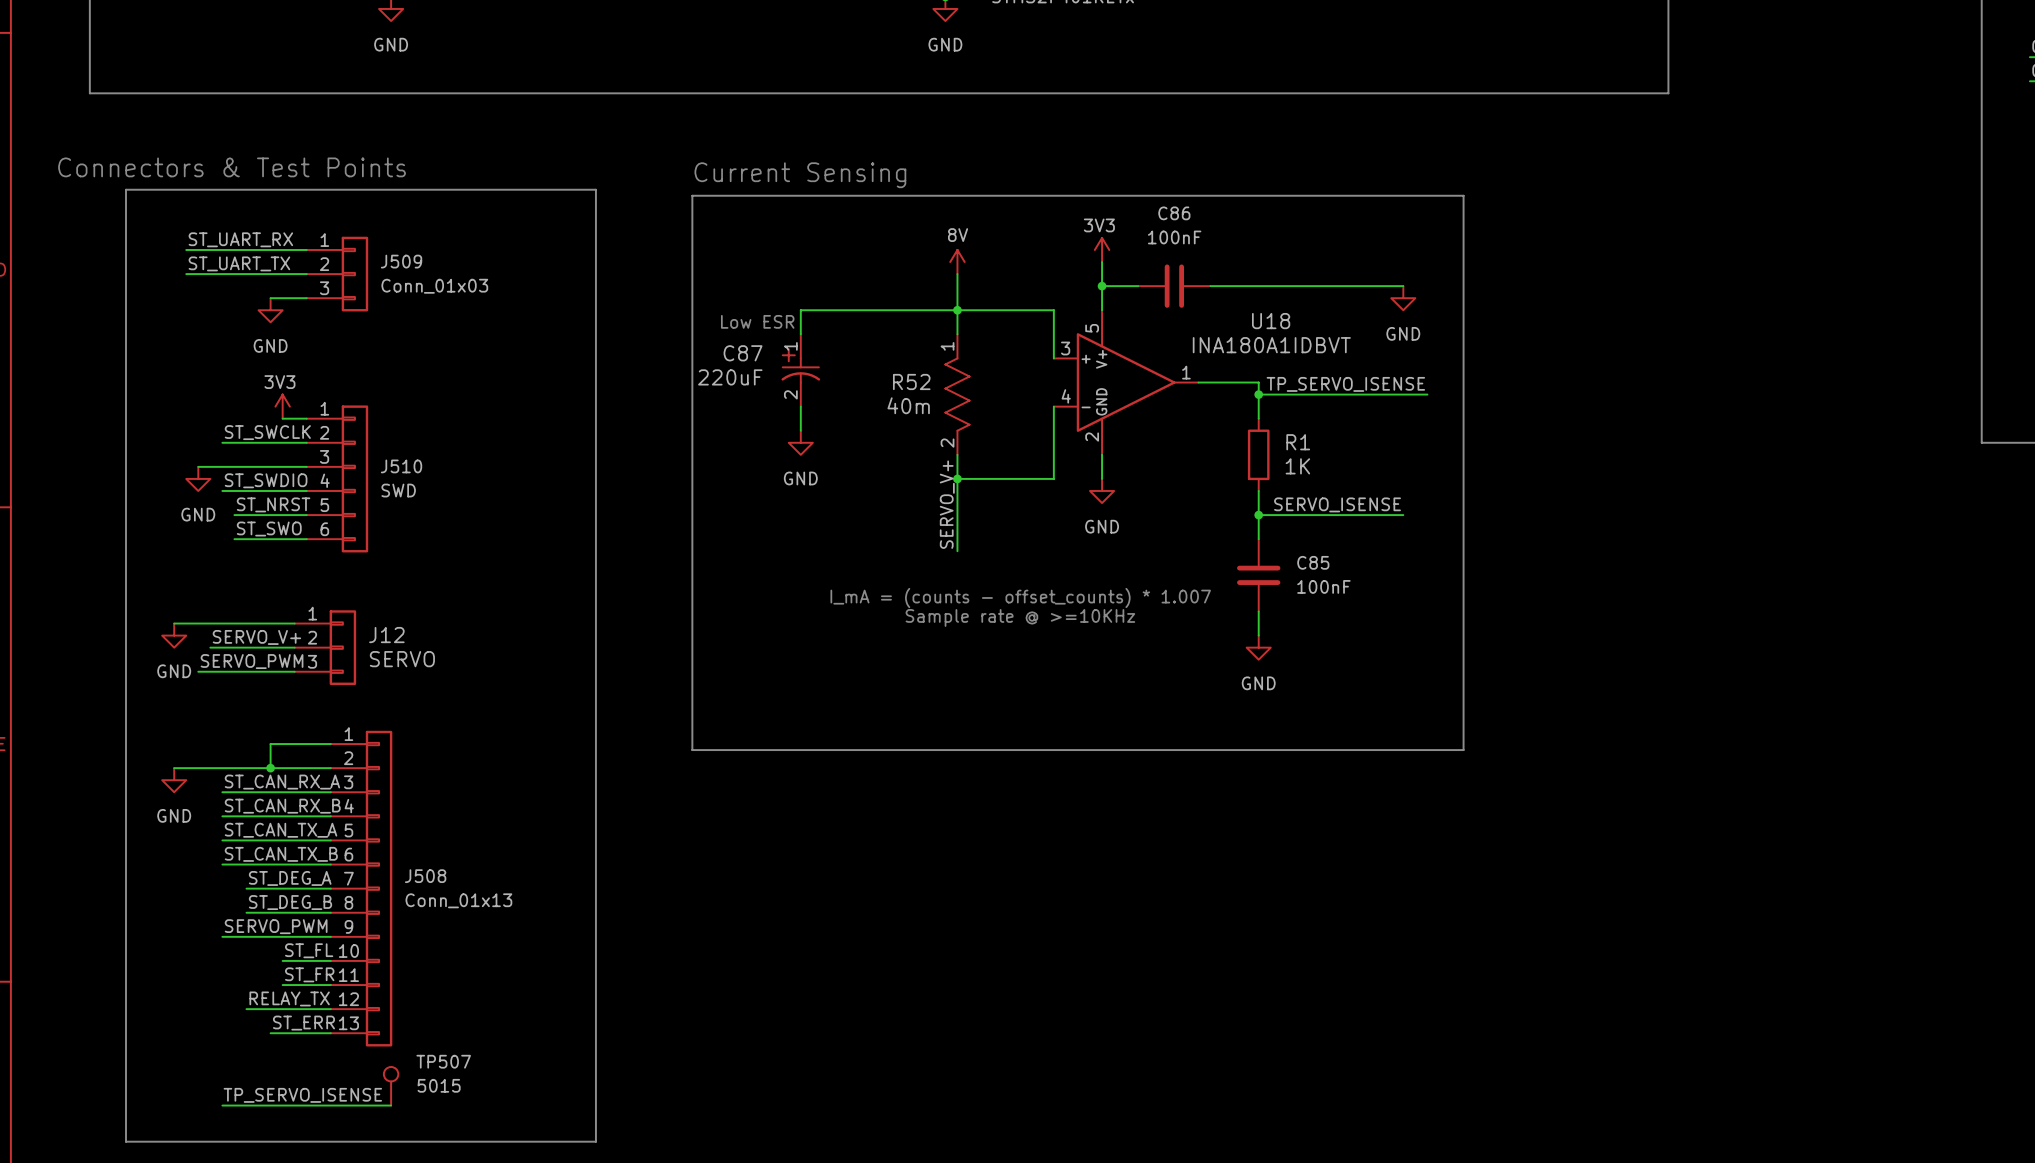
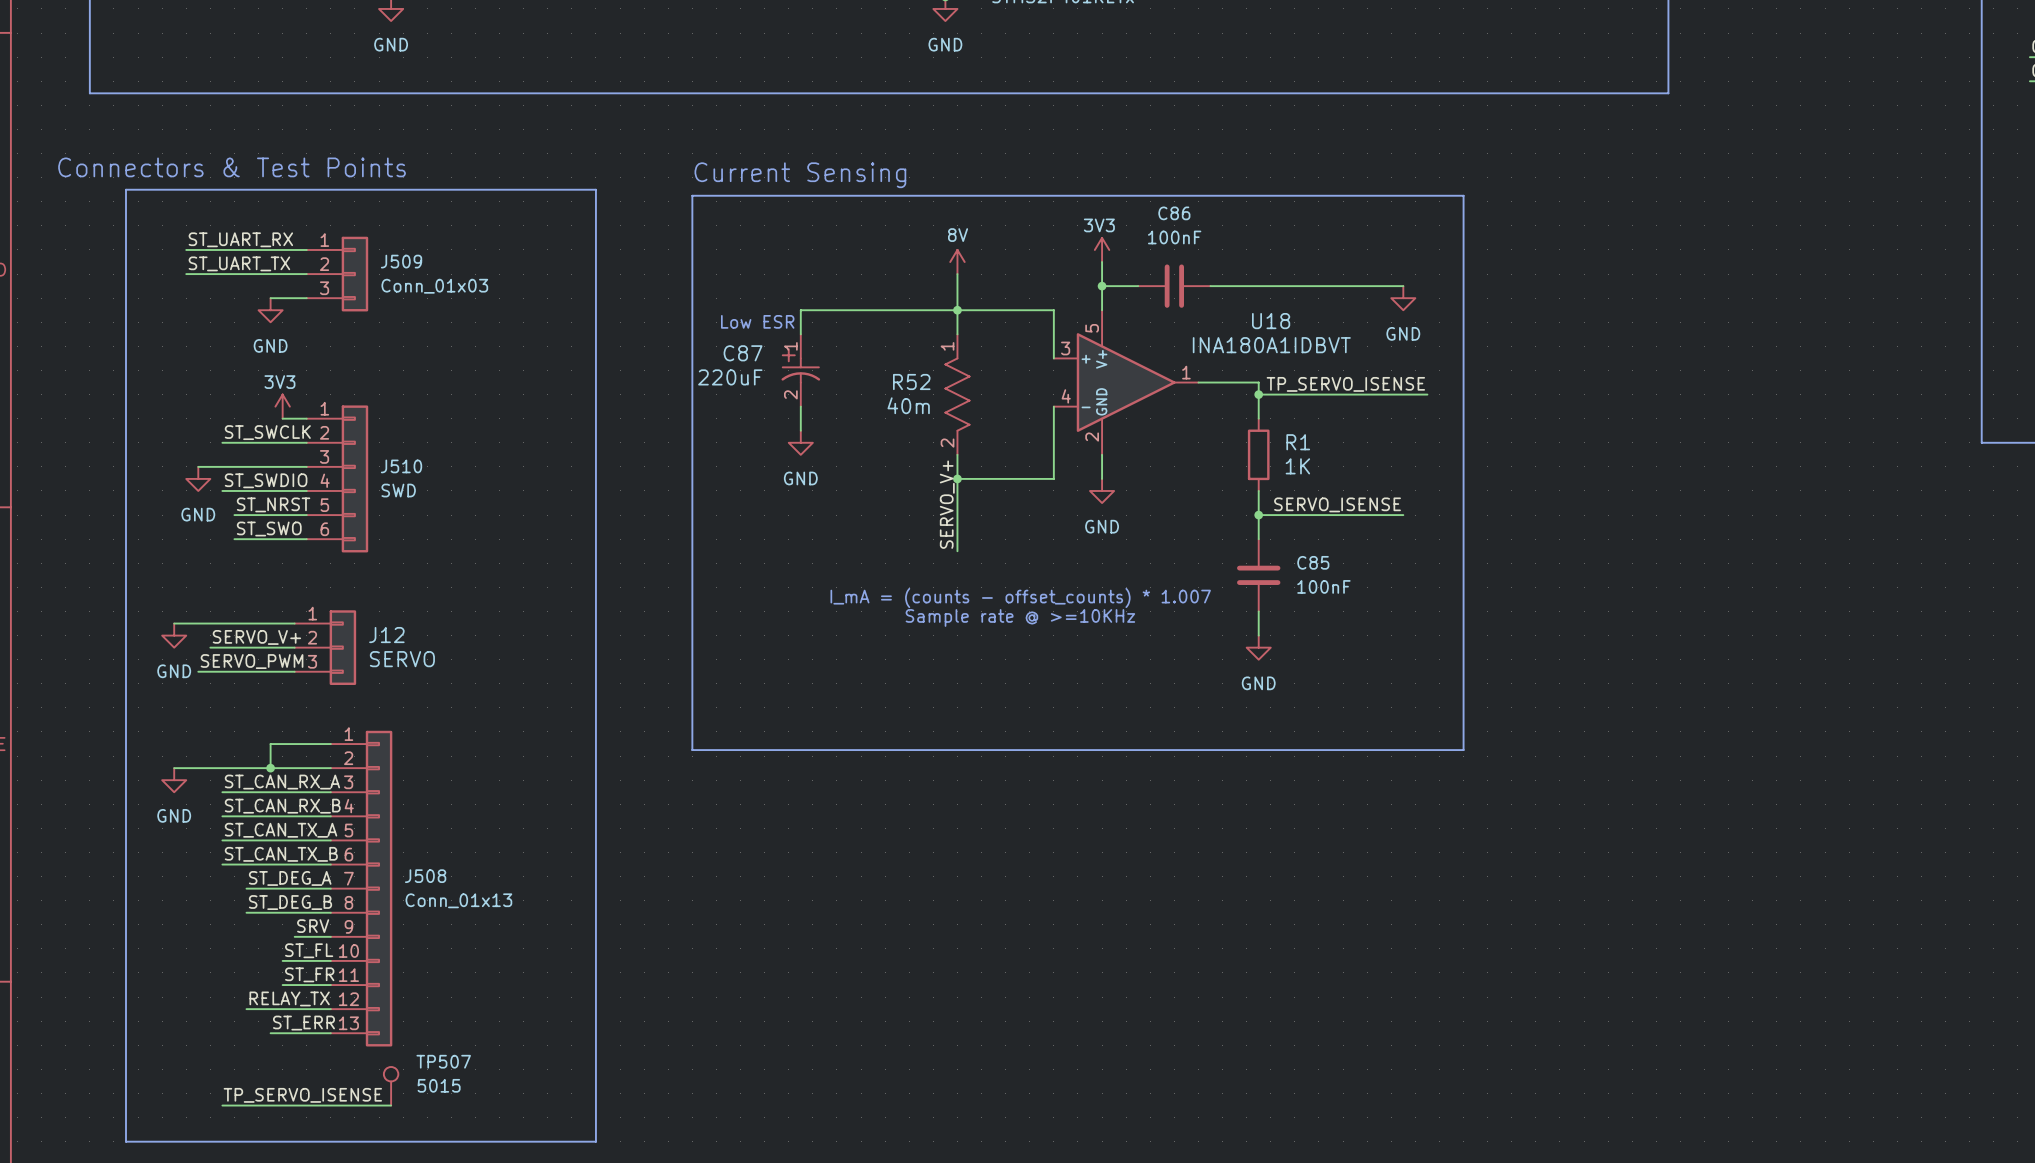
label: SERVO_PWM (276, 926) -> none
label: none -> SRV (313, 926)
wire: (222, 936) (294, 936) -> none

